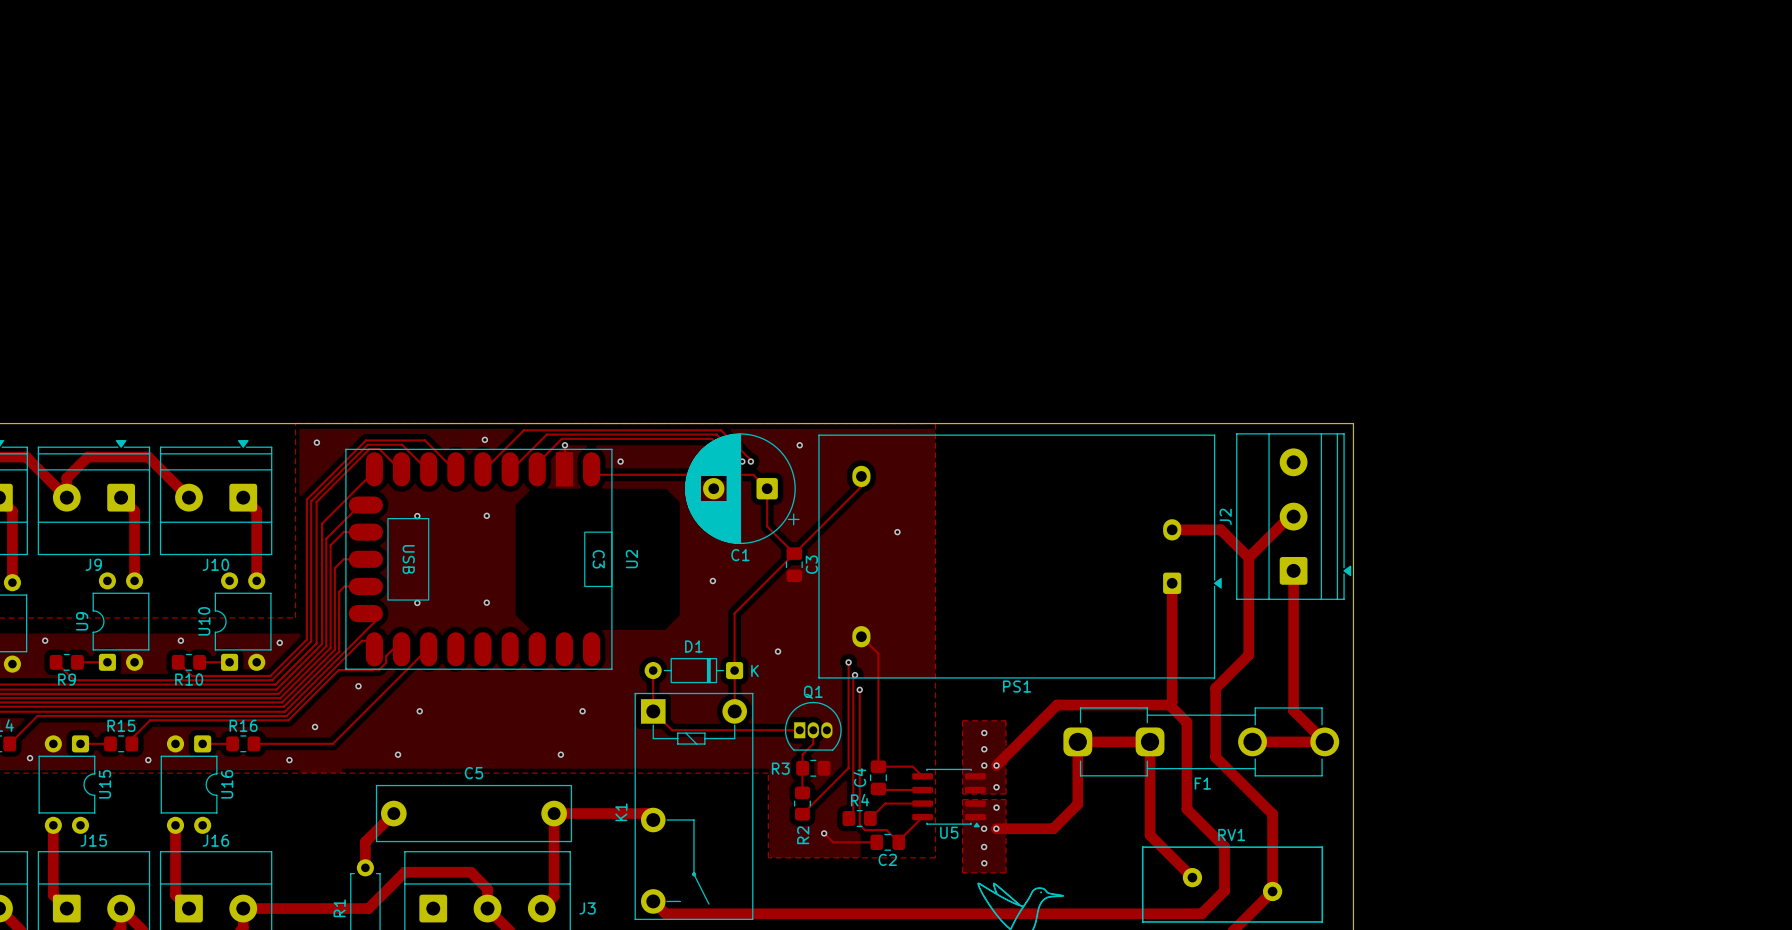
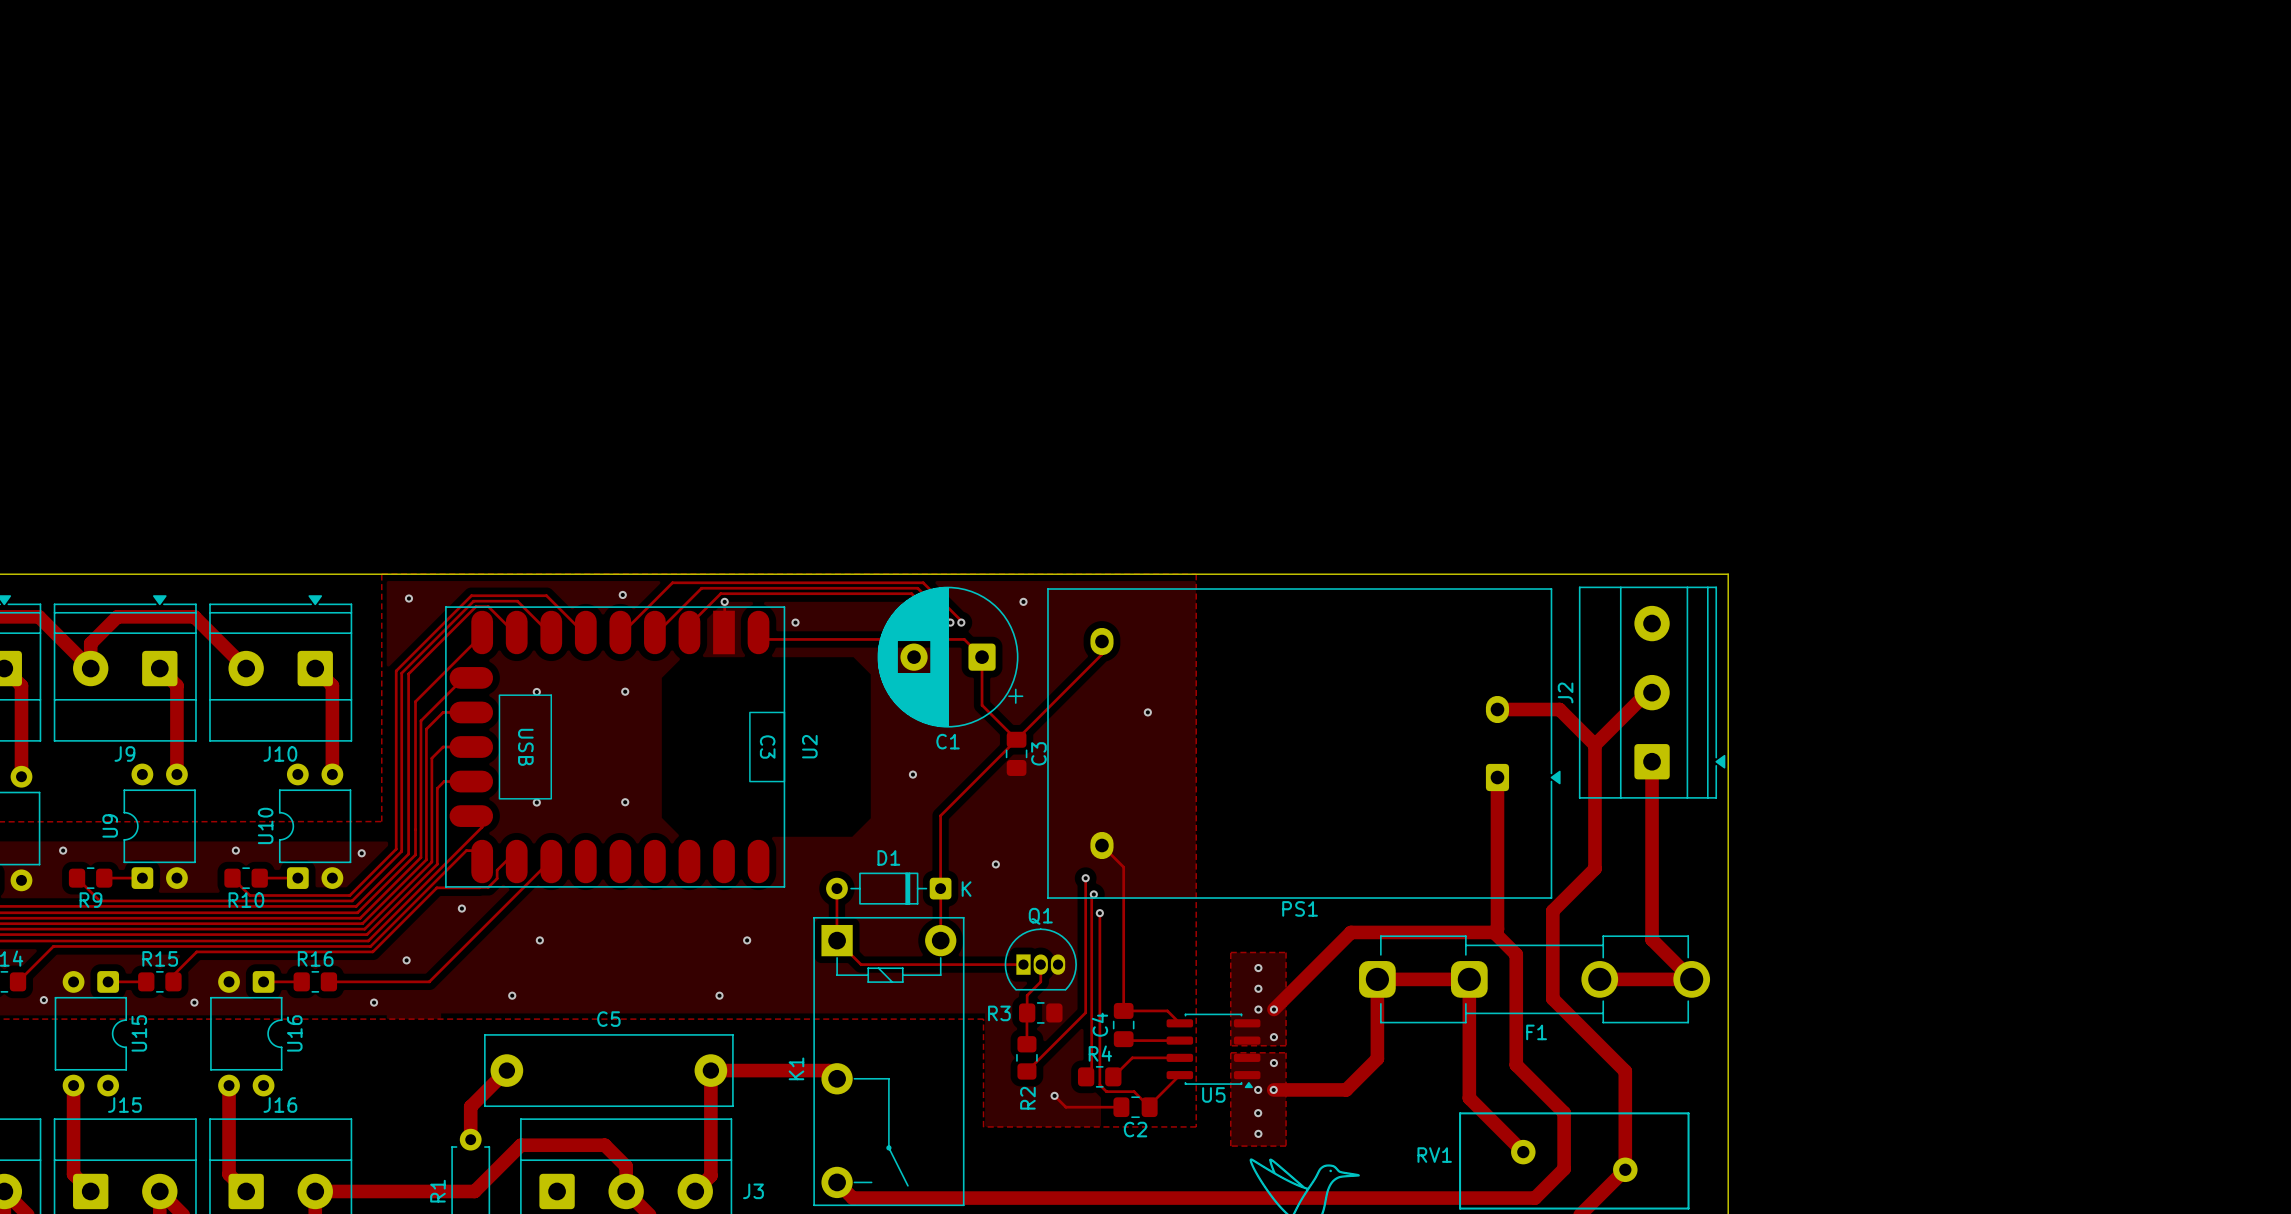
RV1 name position: RV1 (1231, 835) -> RV1 (1434, 1155)

